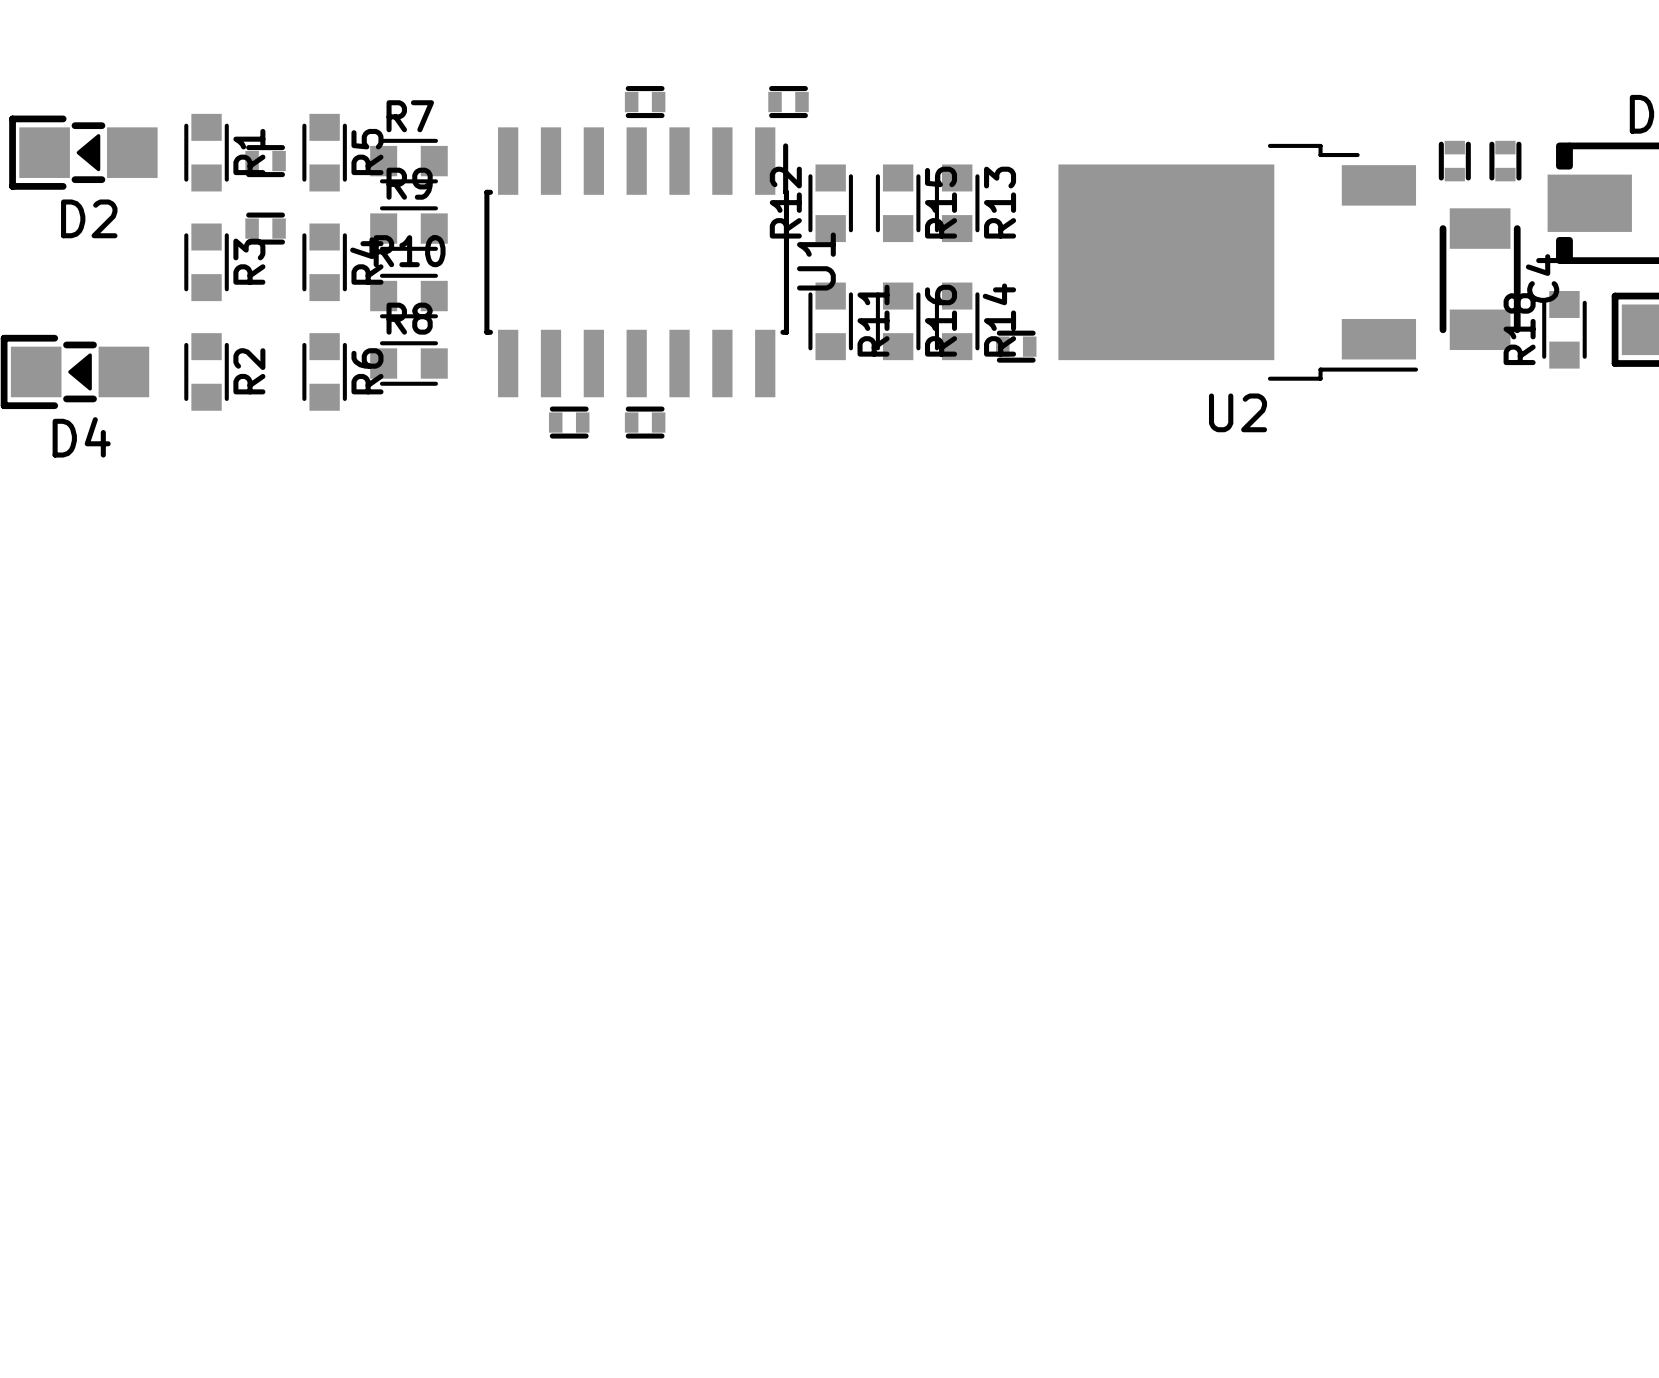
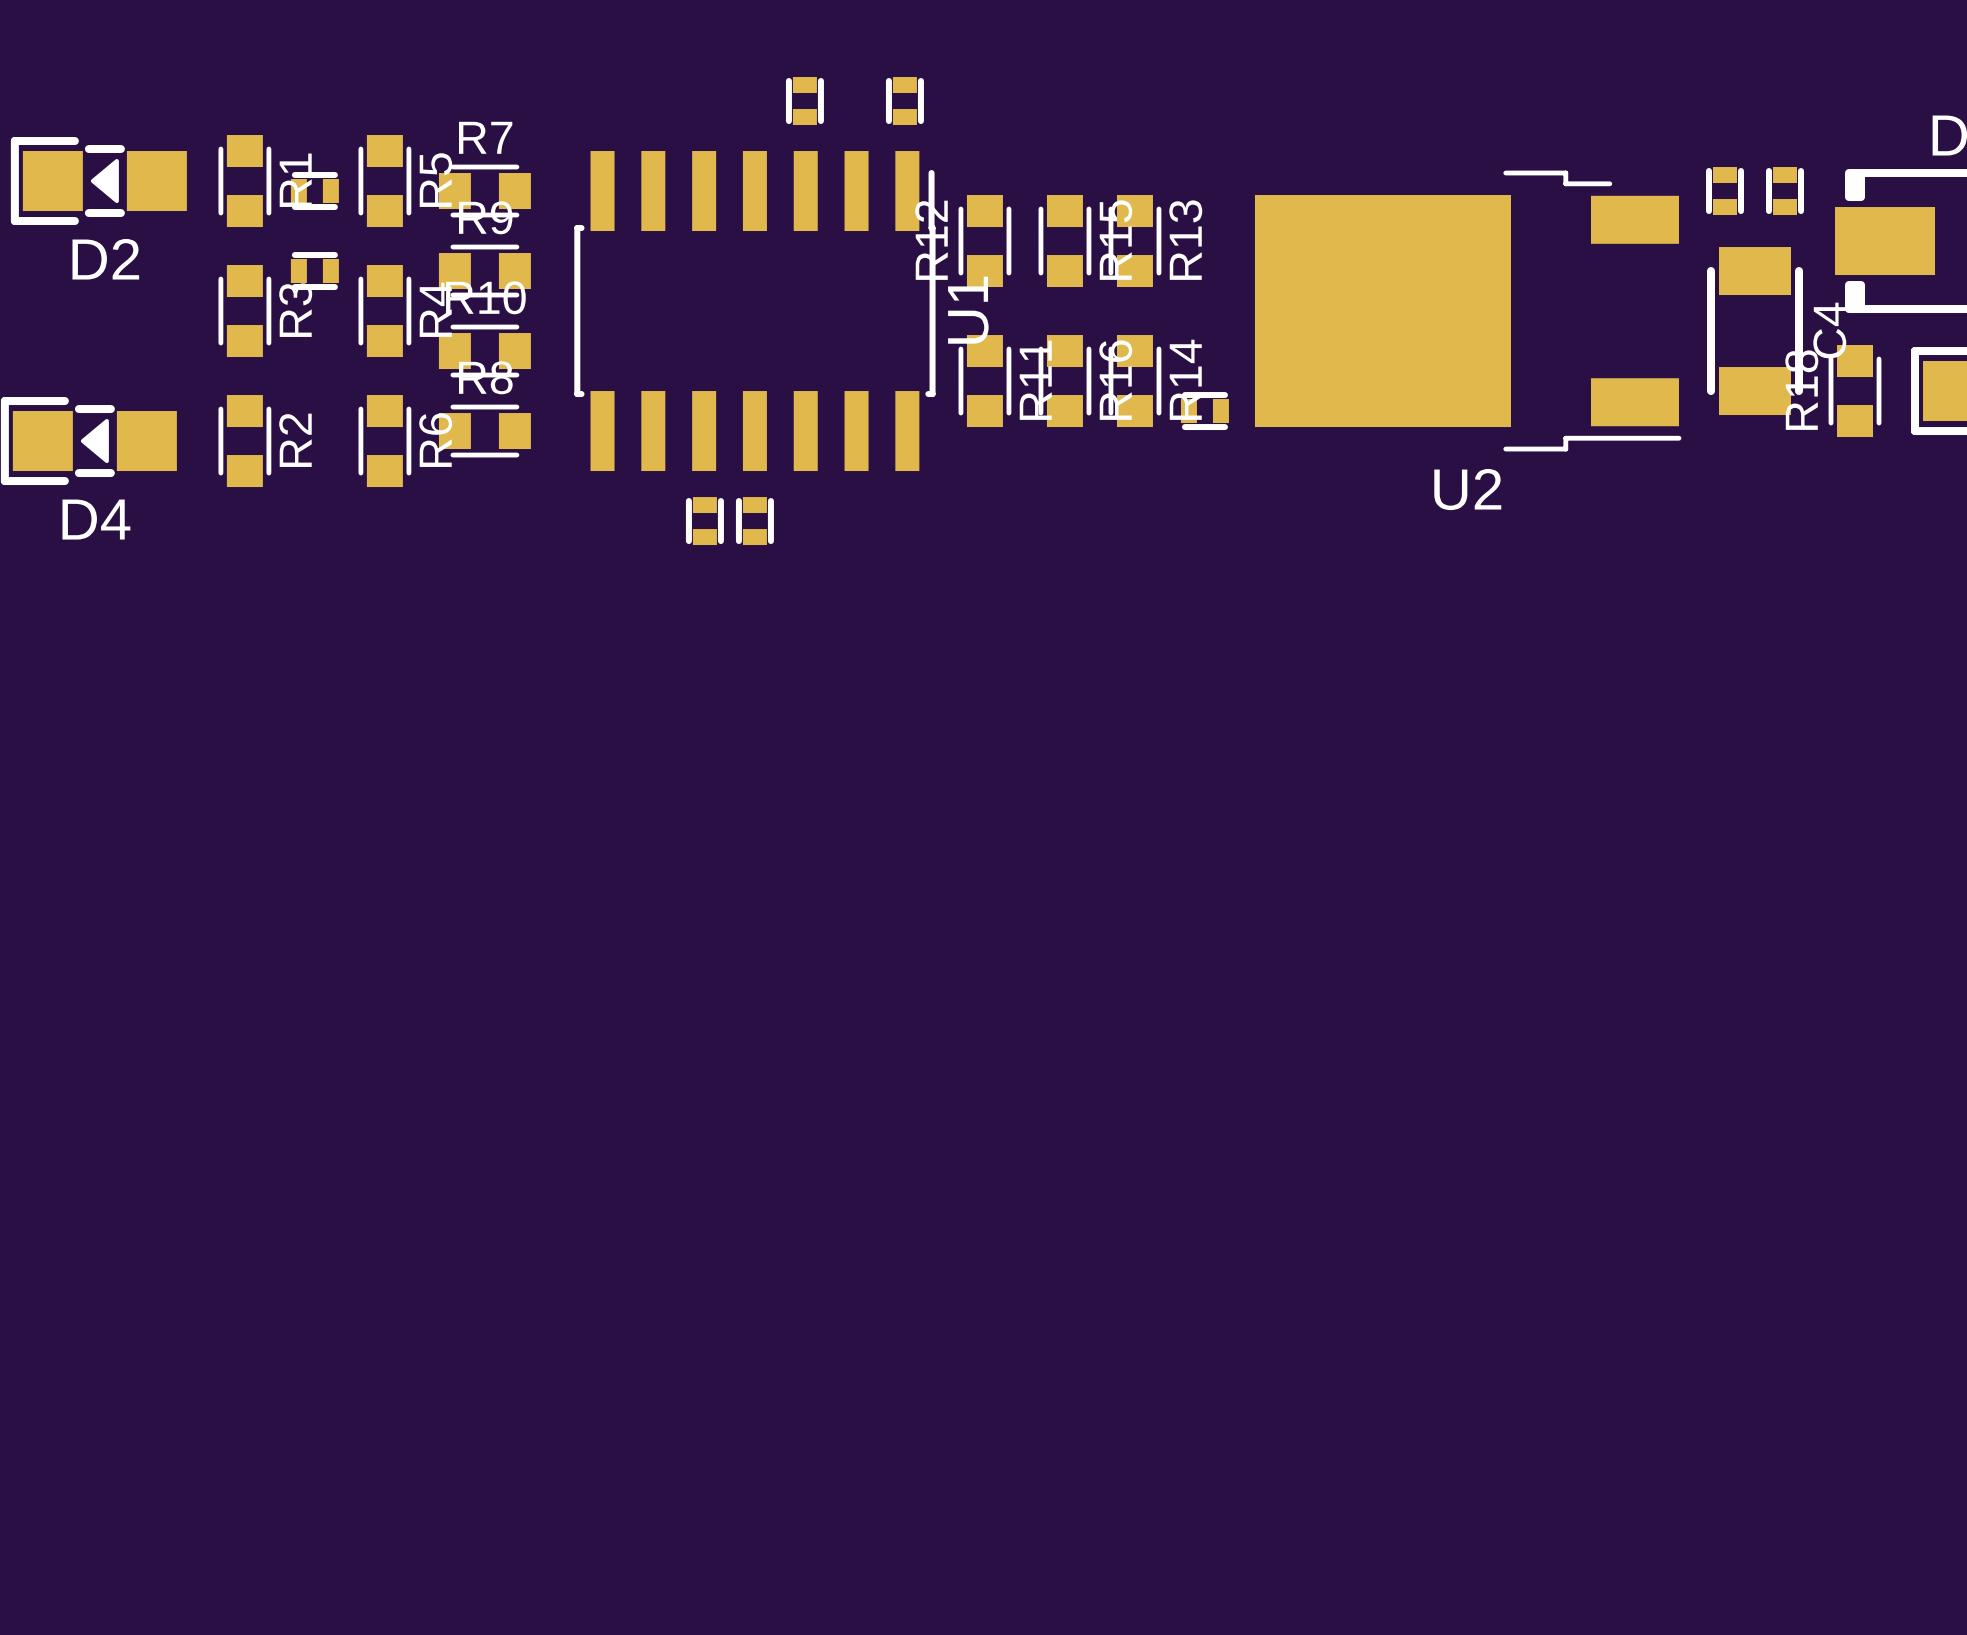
part rotation: 0° (645, 102) -> 90° clockwise (804, 101)
part position: (645, 102) -> (804, 101)
part rotation: 0° (788, 102) -> 90° clockwise (904, 101)
part position: (788, 102) -> (904, 101)
part rotation: 0° (569, 422) -> 90° clockwise (704, 521)
part position: (569, 422) -> (704, 521)
part rotation: 0° (645, 422) -> 90° clockwise (754, 521)

